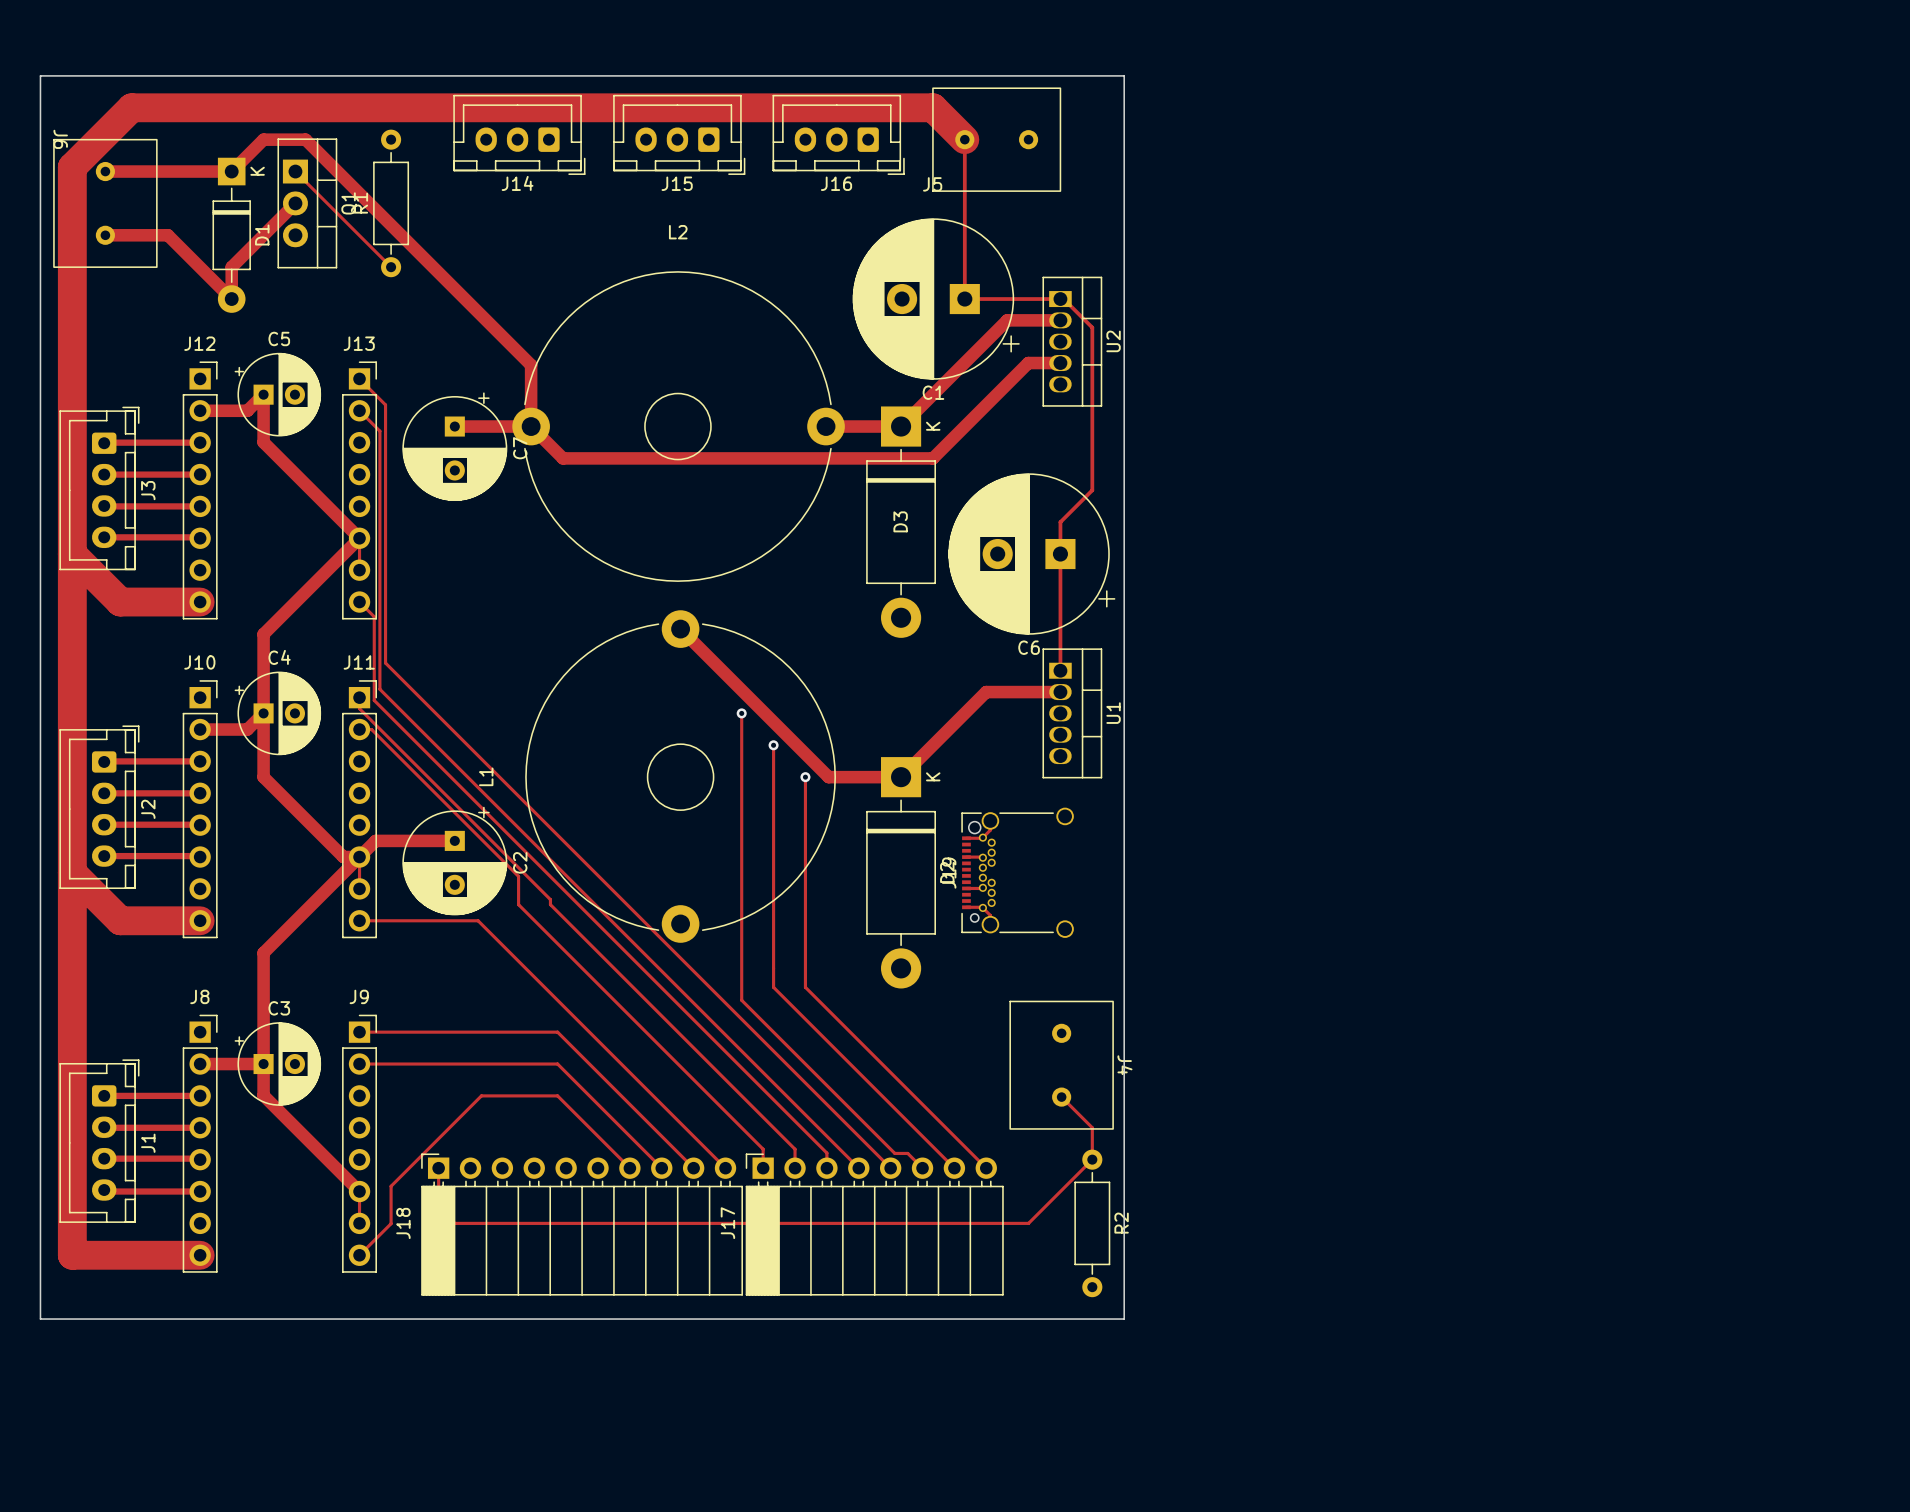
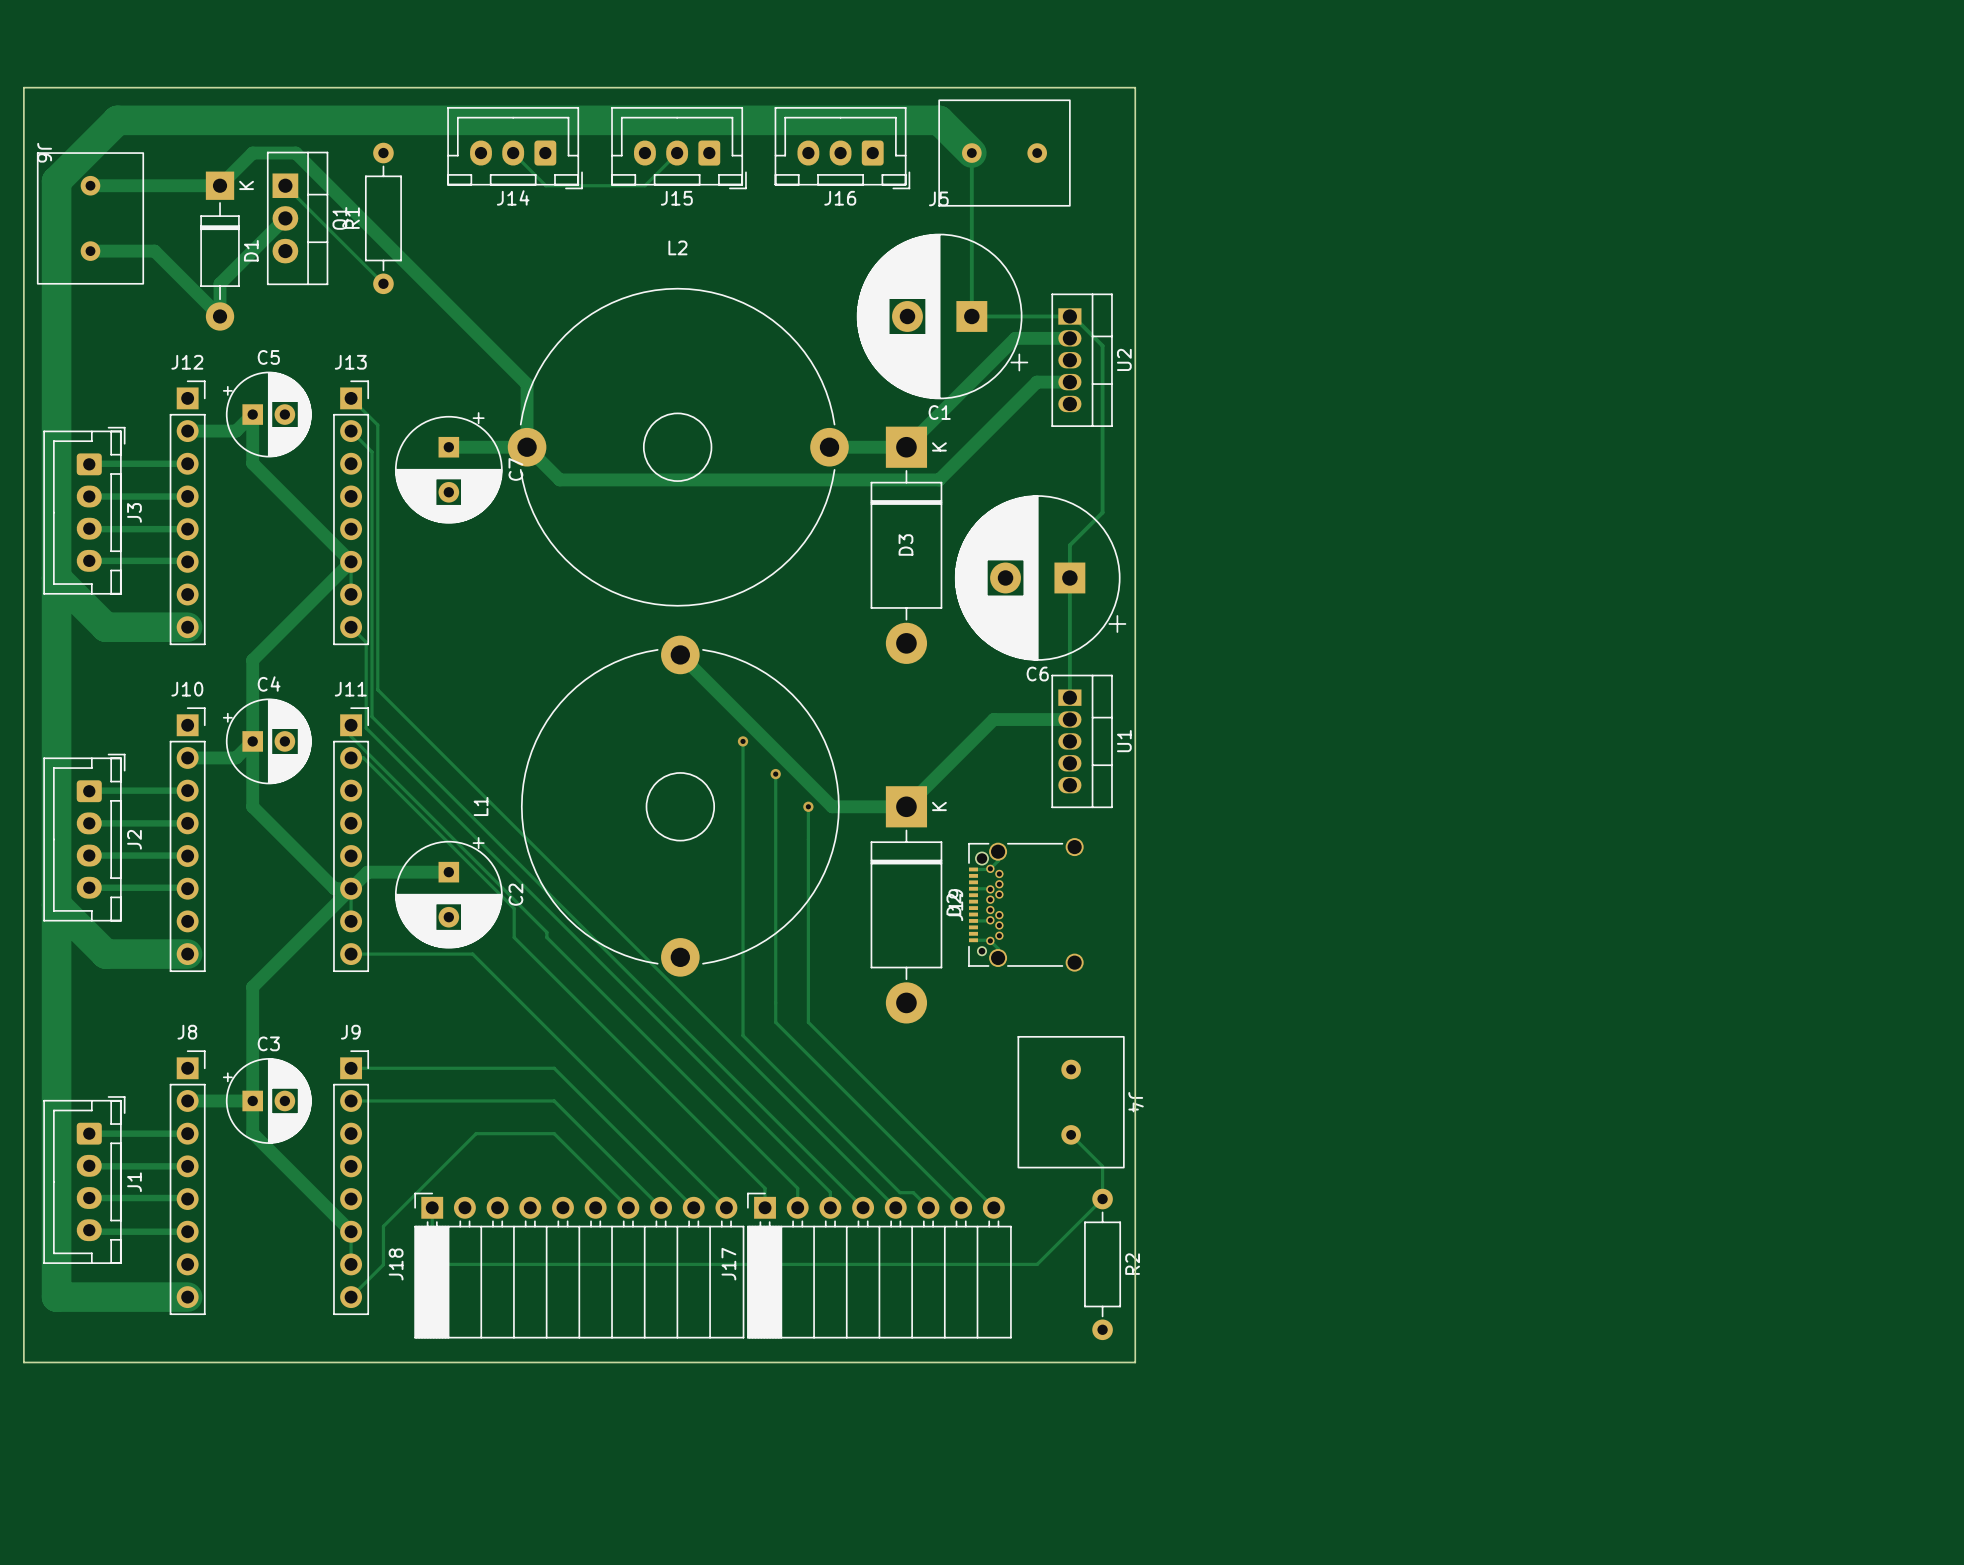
track: none -> (513, 153) (545, 185) (644, 185) (677, 153)

